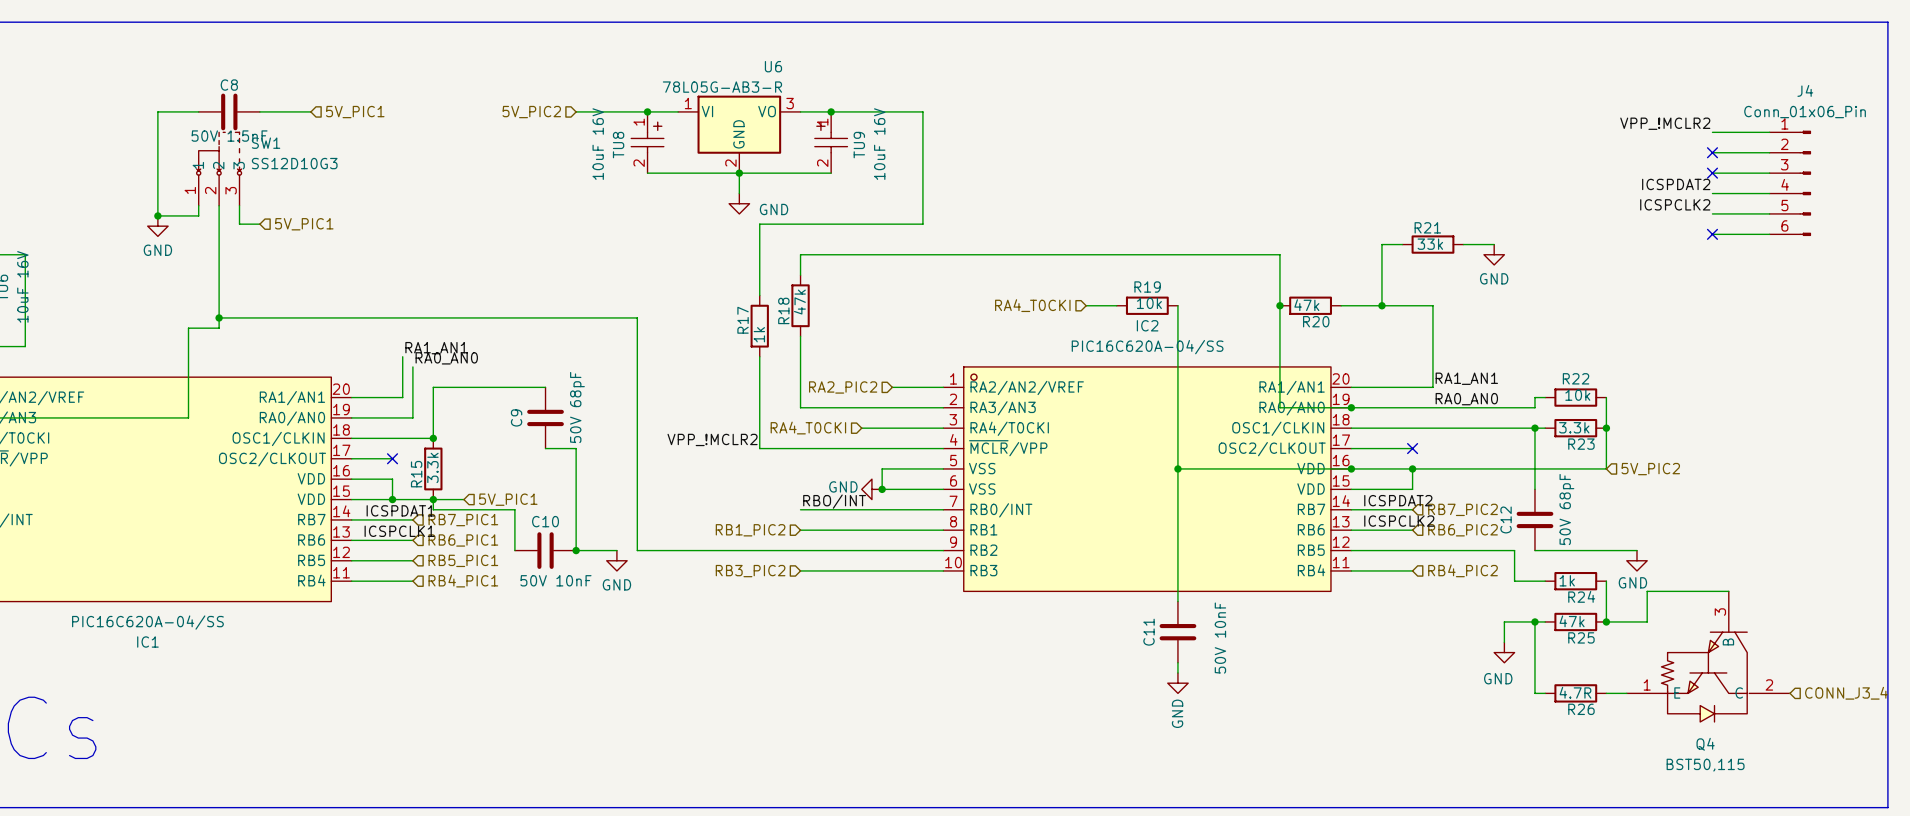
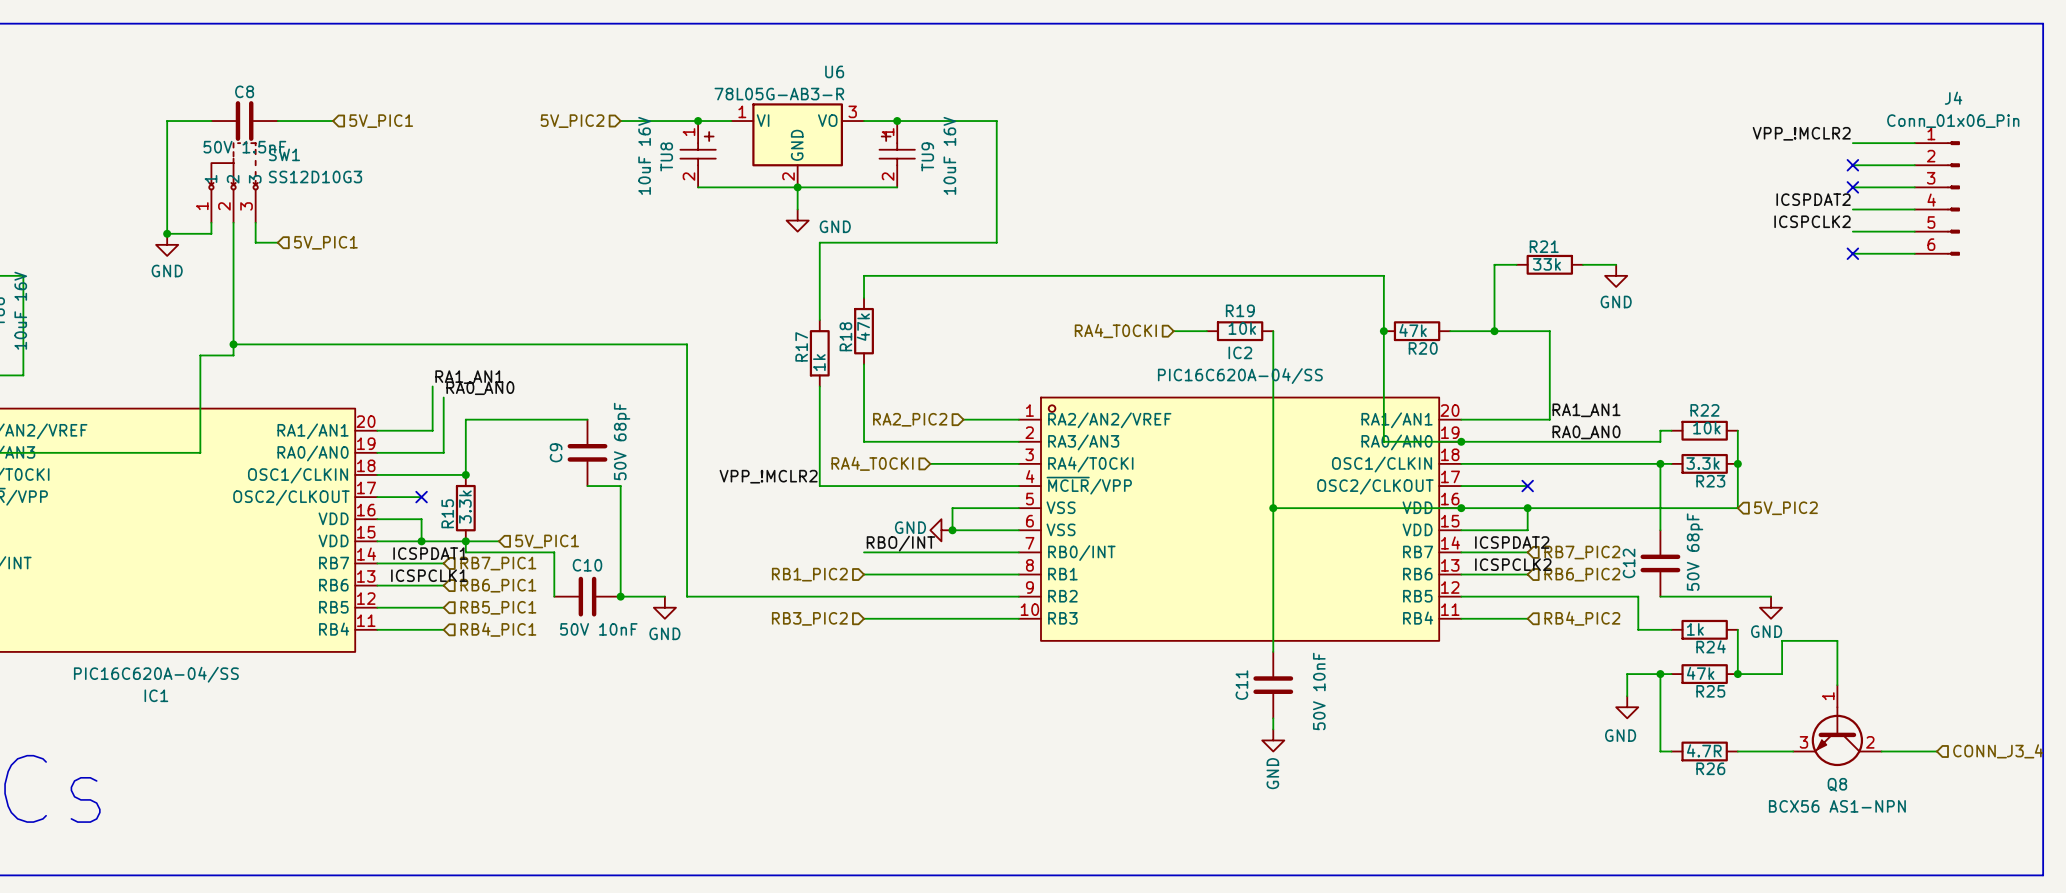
wire: (1698, 591) (1728, 591) -> (1837, 640) (1837, 685)
Q4: BST50,115 (1708, 656) -> none
Q8: none -> BCX56 AS1-NPN (1837, 725)

